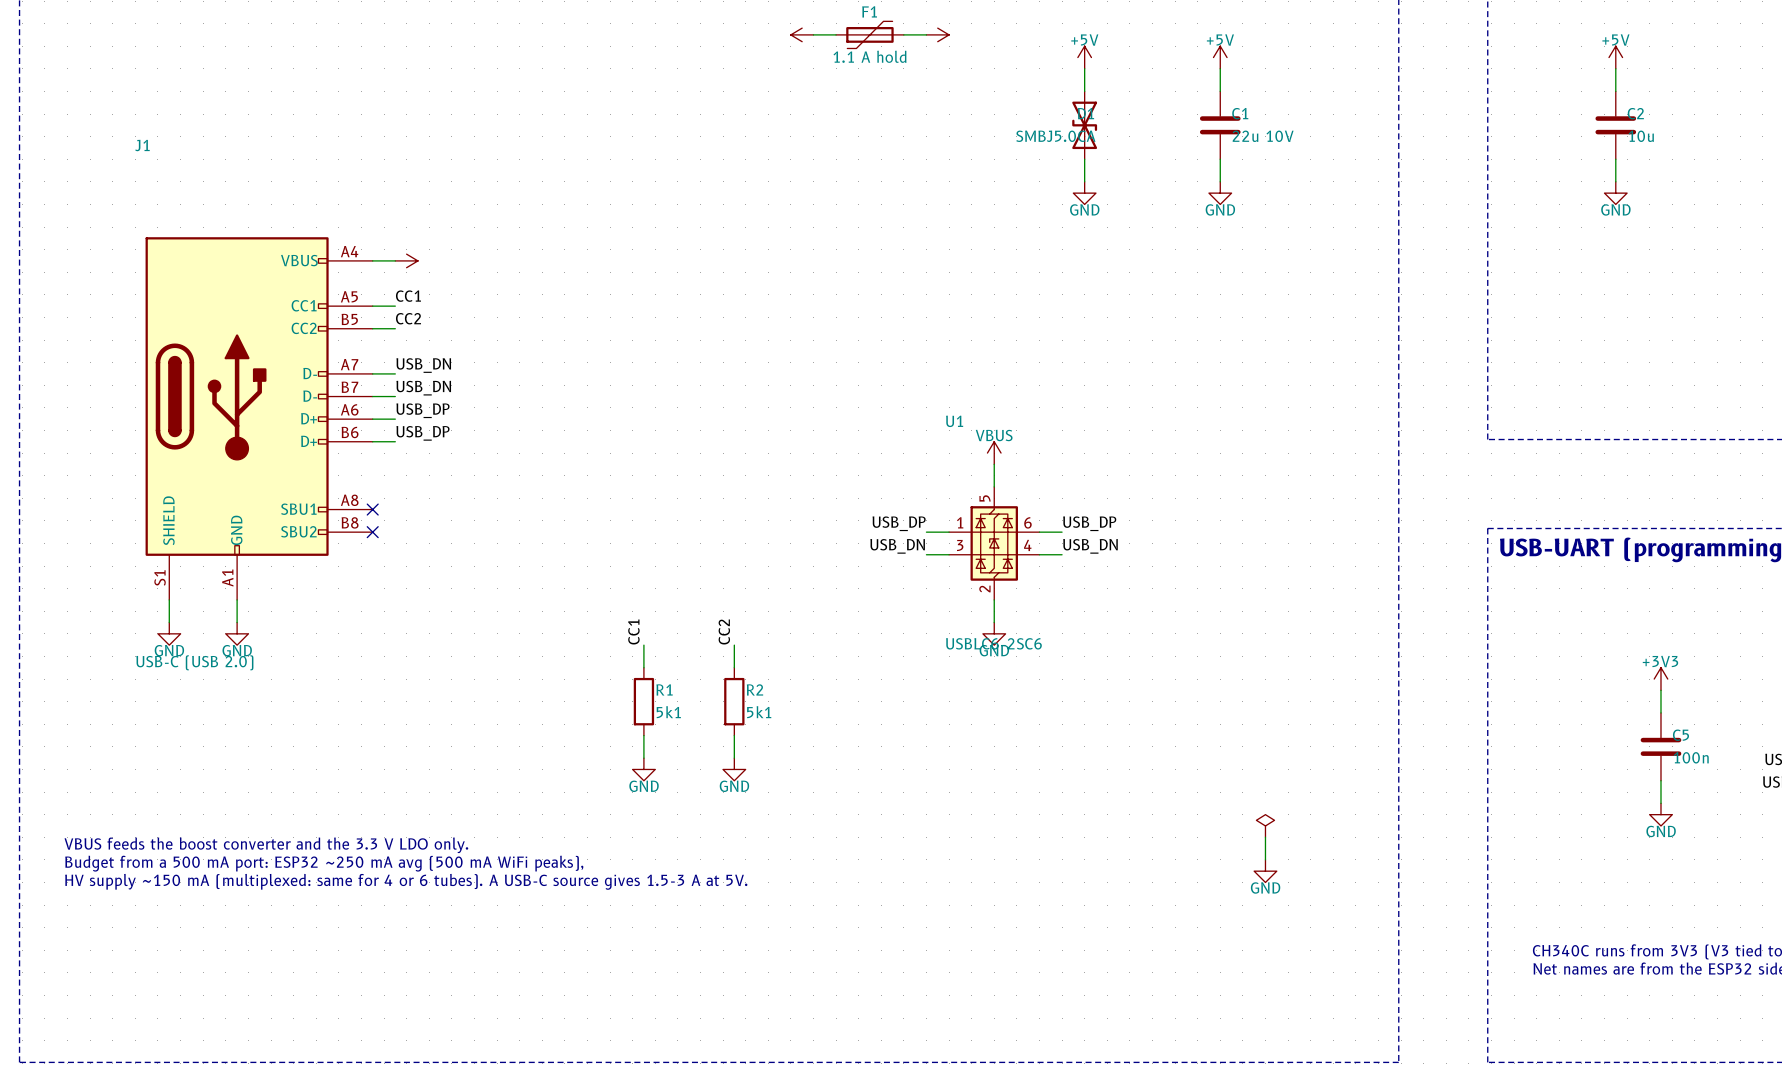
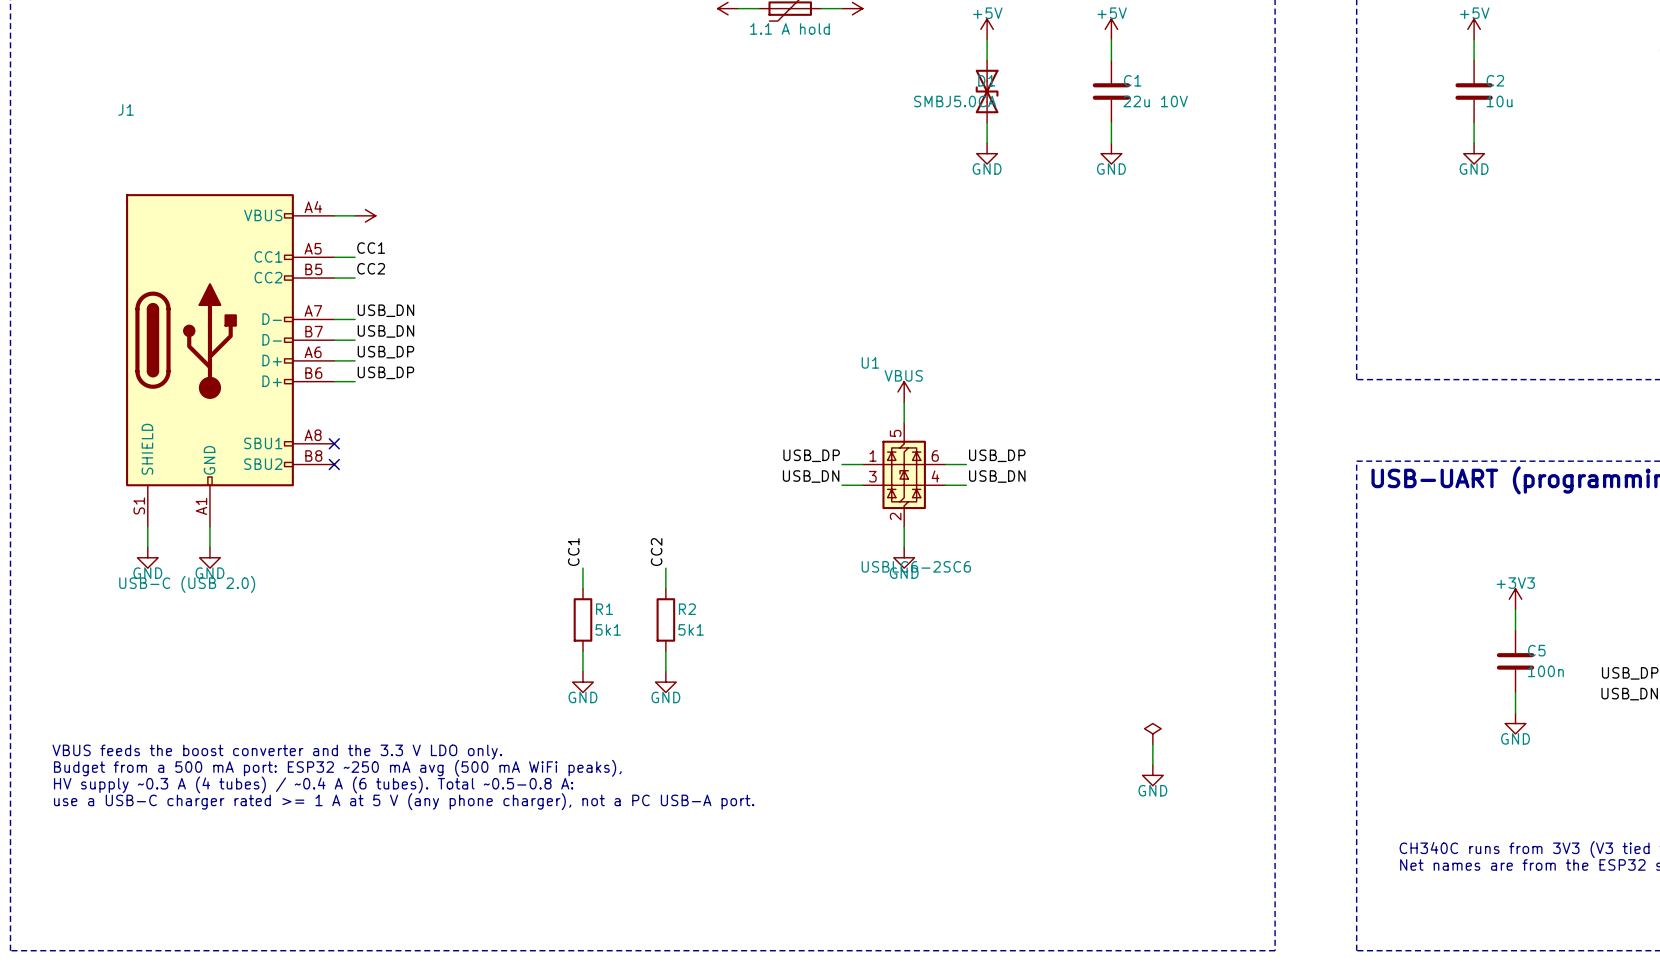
text: HV supply ~150 mA (multiplexed: same for 4 or 6 tubes). A USB-C source gives 1.5-3 A at 5V. (406, 881) -> HV supply ~0.3 A (4 tubes) / ~0.4 A (6 tubes). Total ~0.5-0.8 A: (313, 784)
text: none -> use a USB-C charger rated >= 1 A at 5 V (any phone charger), not a PC USB-A port. (404, 801)

